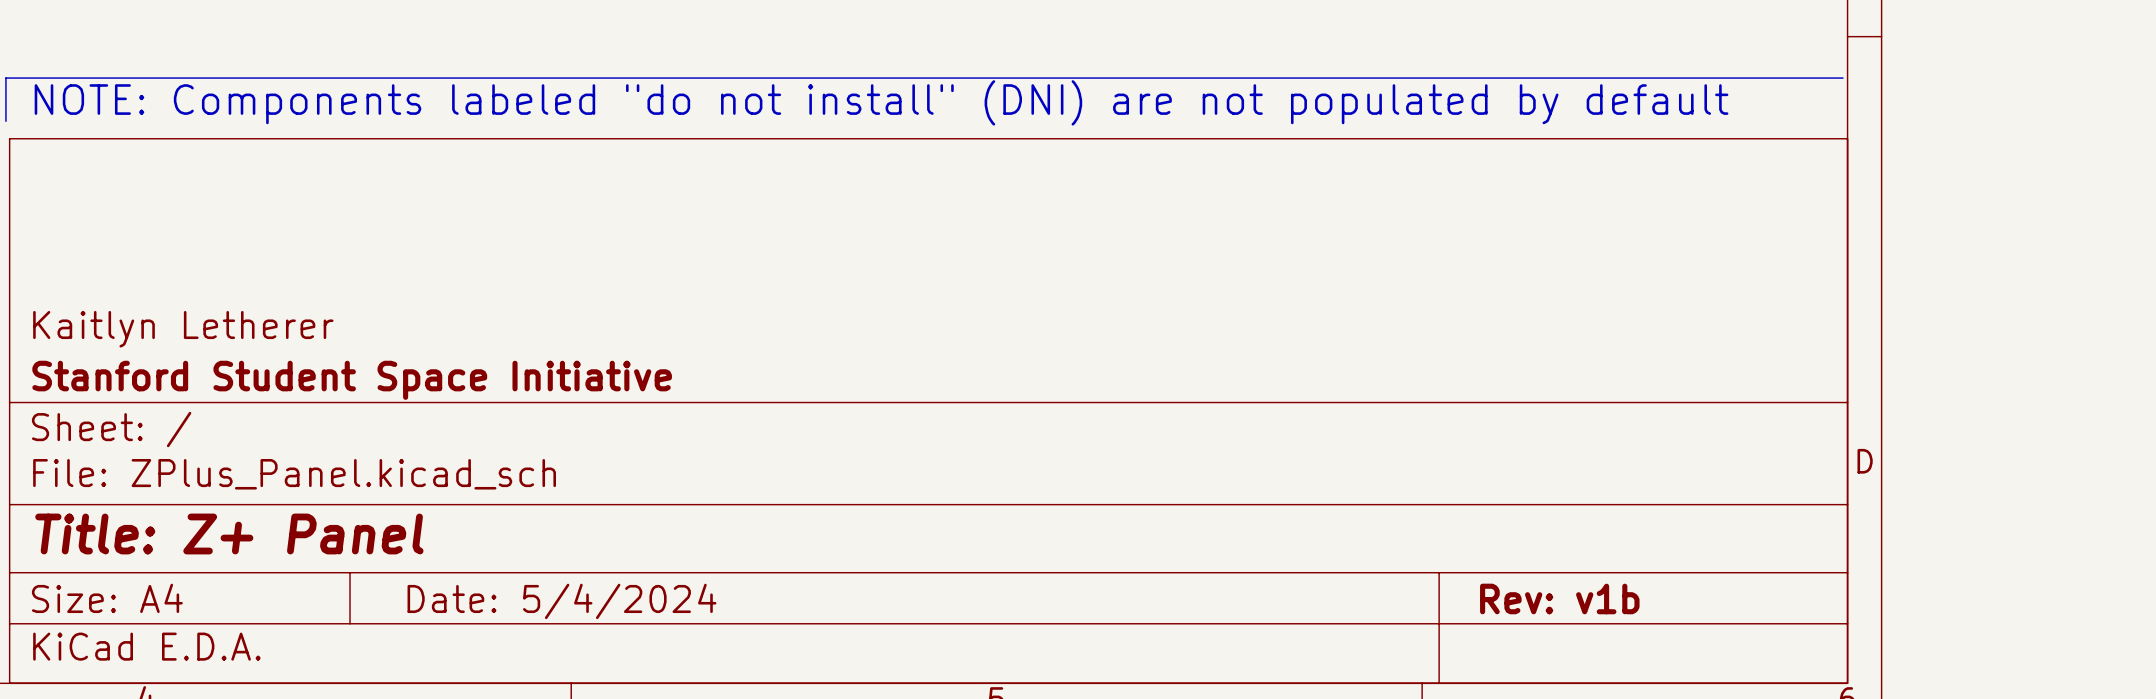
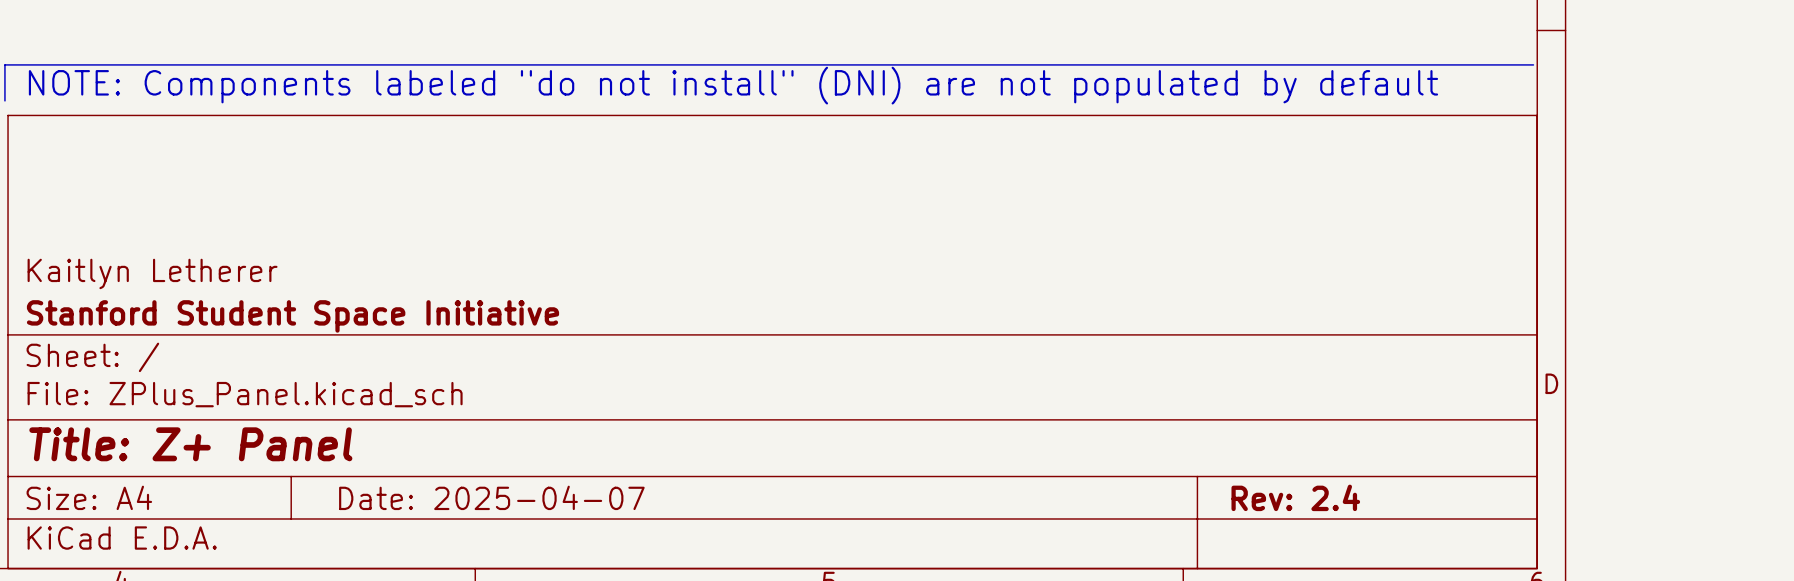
title block: Rev: v1b (1559, 598) -> Rev: 2.4 (1295, 497)
title block: Date: 5/4/2024 (561, 601) -> Date: 2025-04-07 (491, 497)

